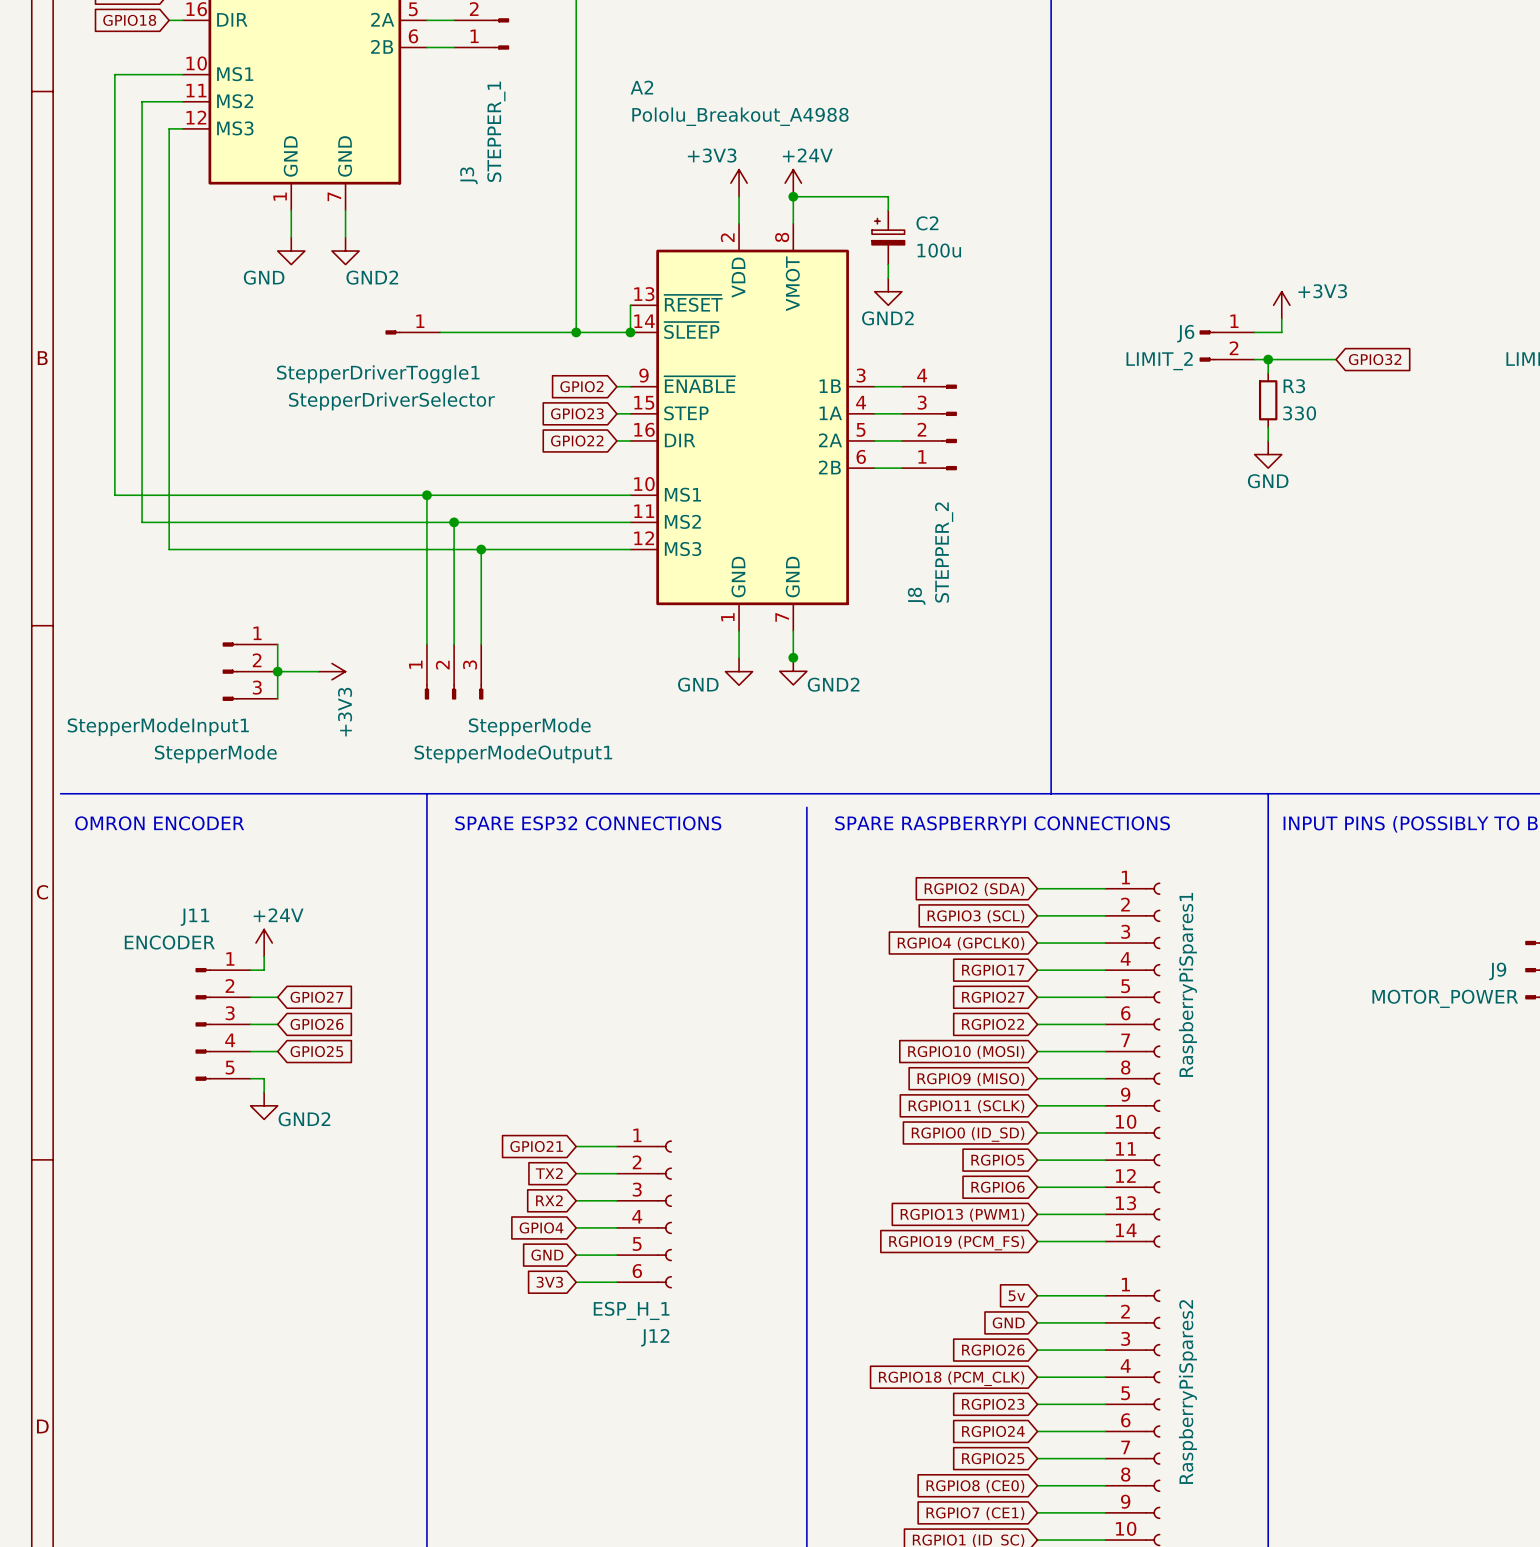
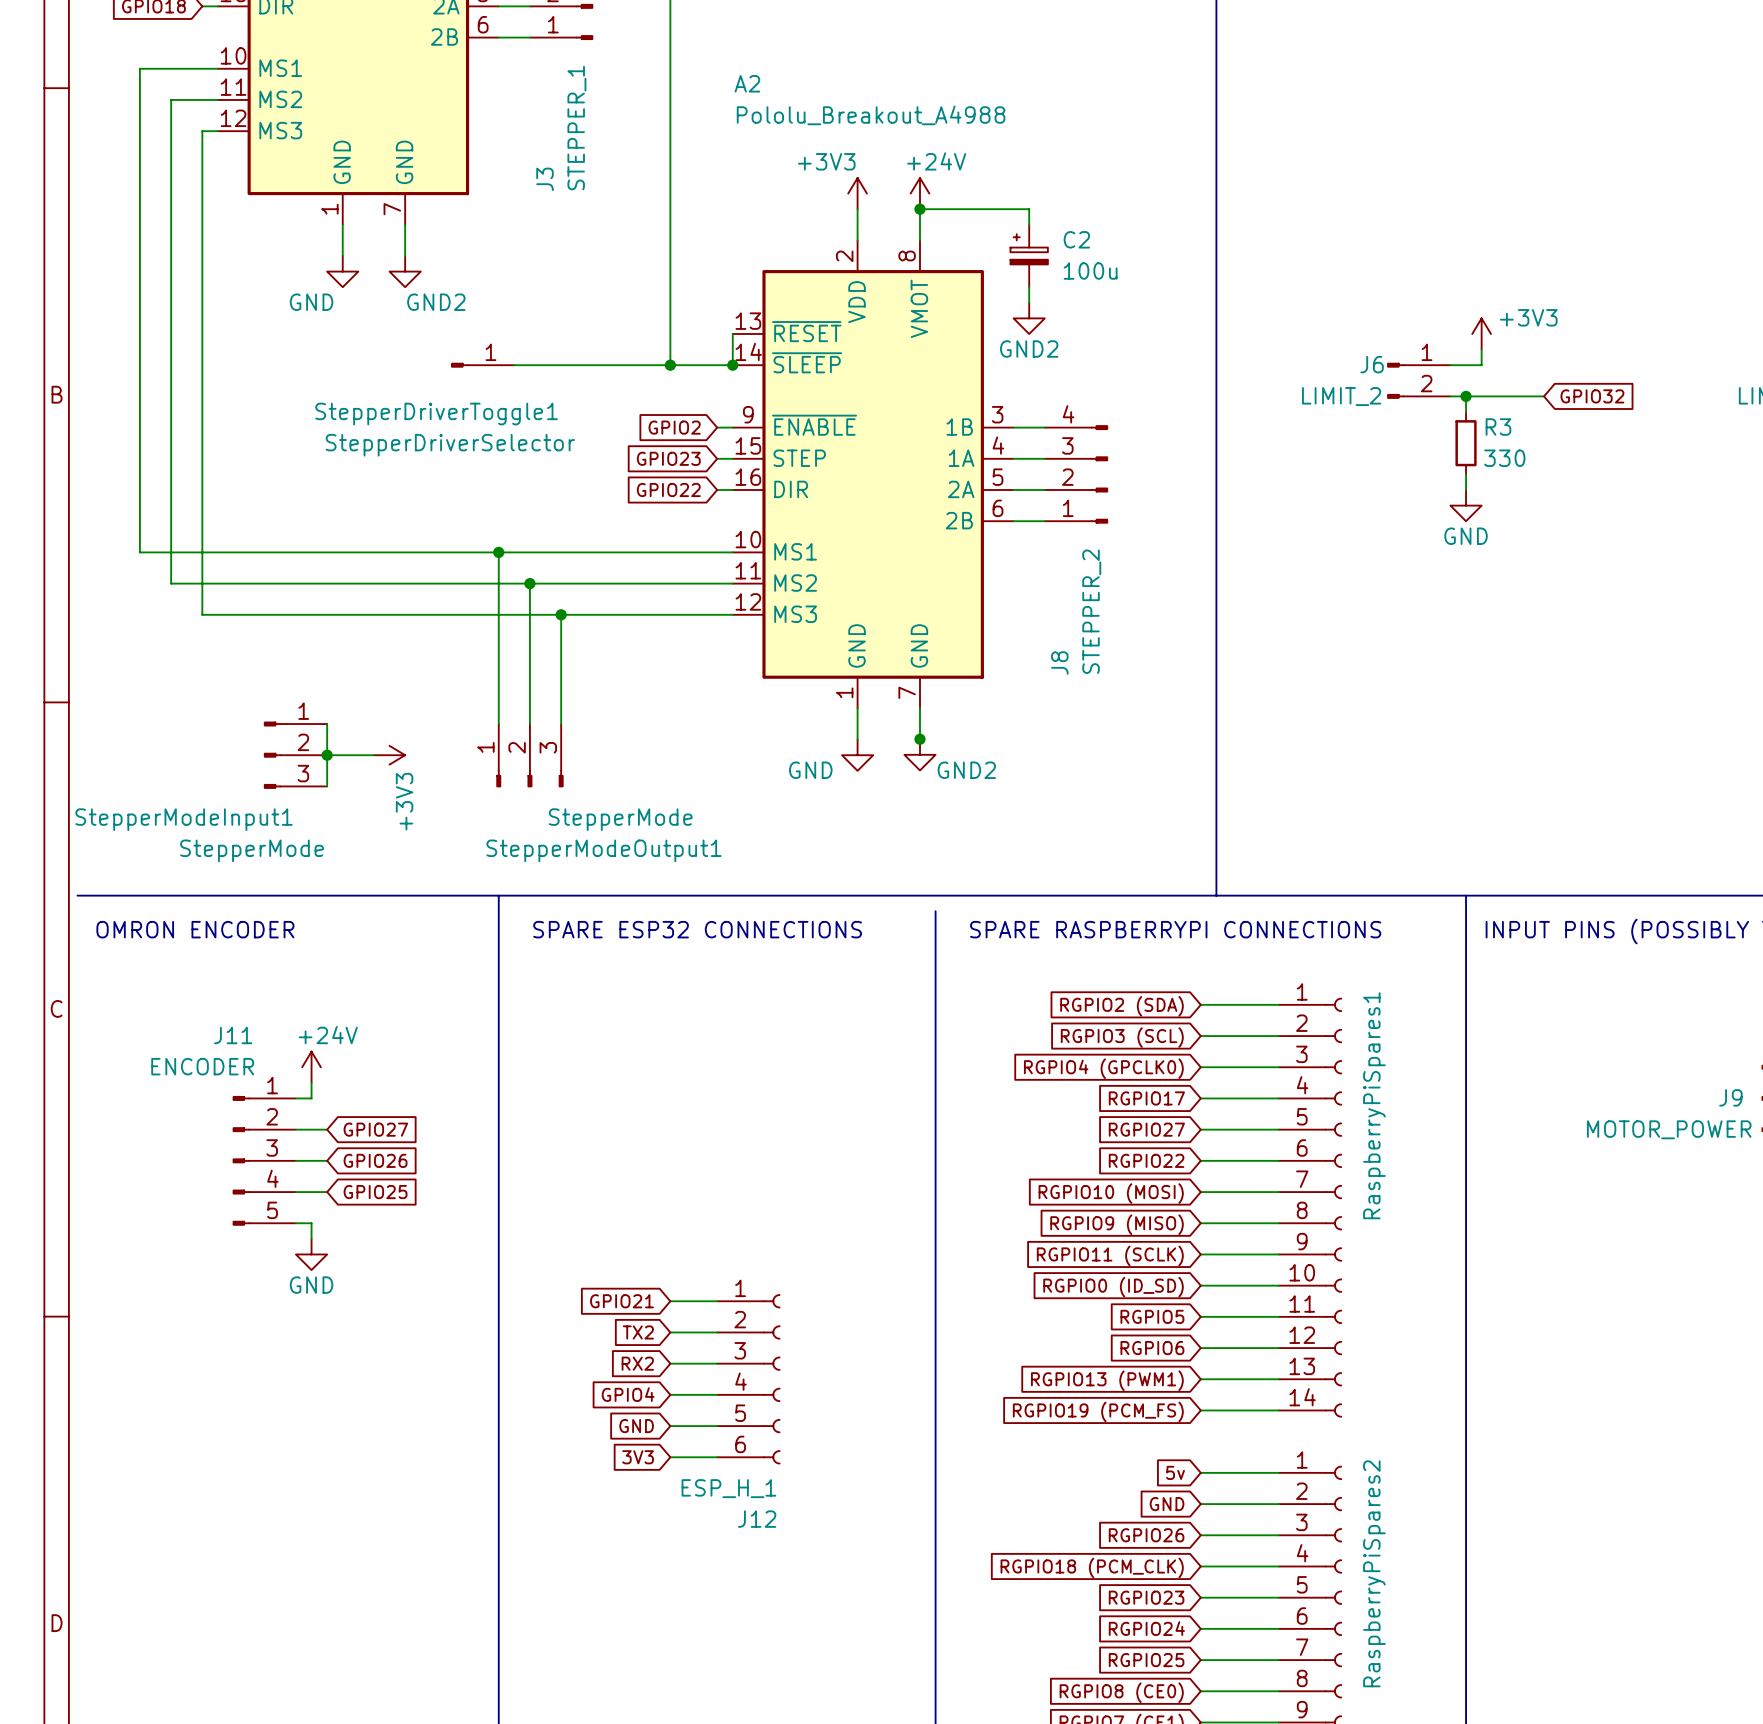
power symbol: GND2 (264, 1105) -> GND (311, 1254)

